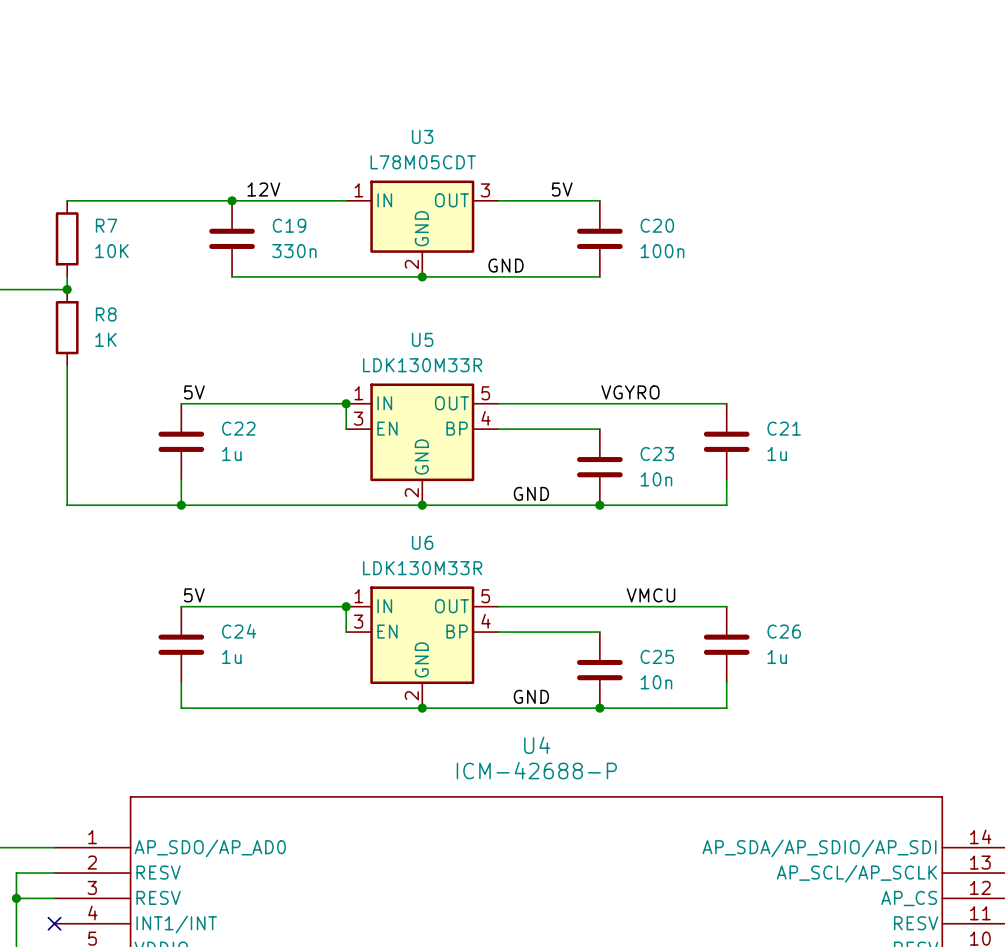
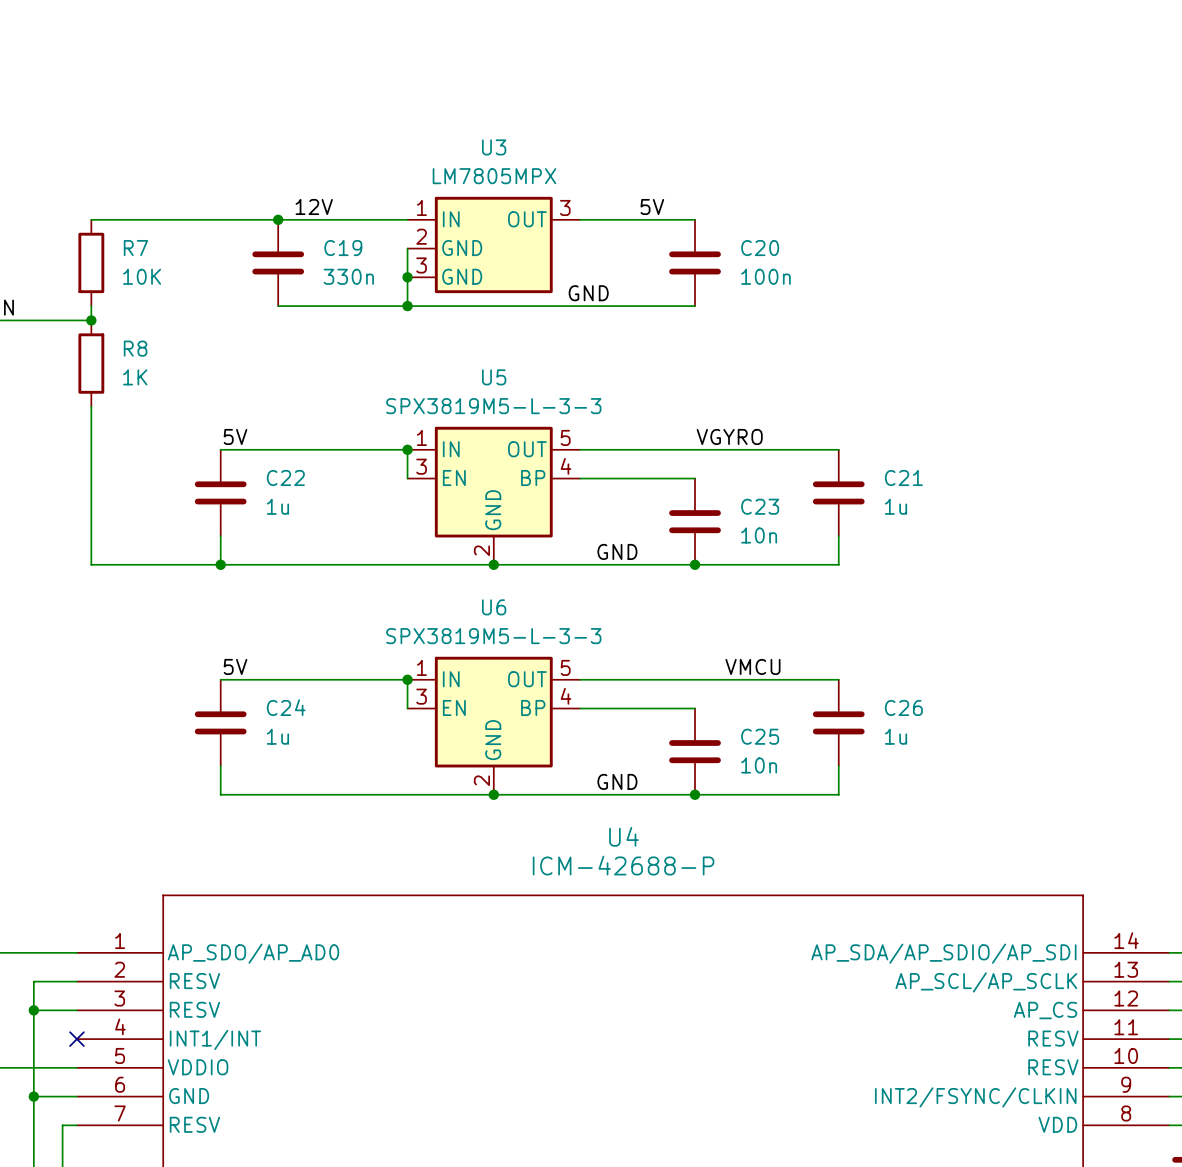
U3 value: L78M05CDT (423, 162) -> LM7805MPX (494, 176)
U3 symbol: [346, 180, 499, 277] -> [407, 196, 581, 294]
wire: none -> (407, 248) (407, 306)
junction: none -> (407, 277)
junction: none -> (407, 306)
junction: (422, 276) -> none
U5 value: LDK130M33R (422, 365) -> SPX3819M5-L-3-3 (493, 406)
U6 value: LDK130M33R (422, 568) -> SPX3819M5-L-3-3 (493, 636)

